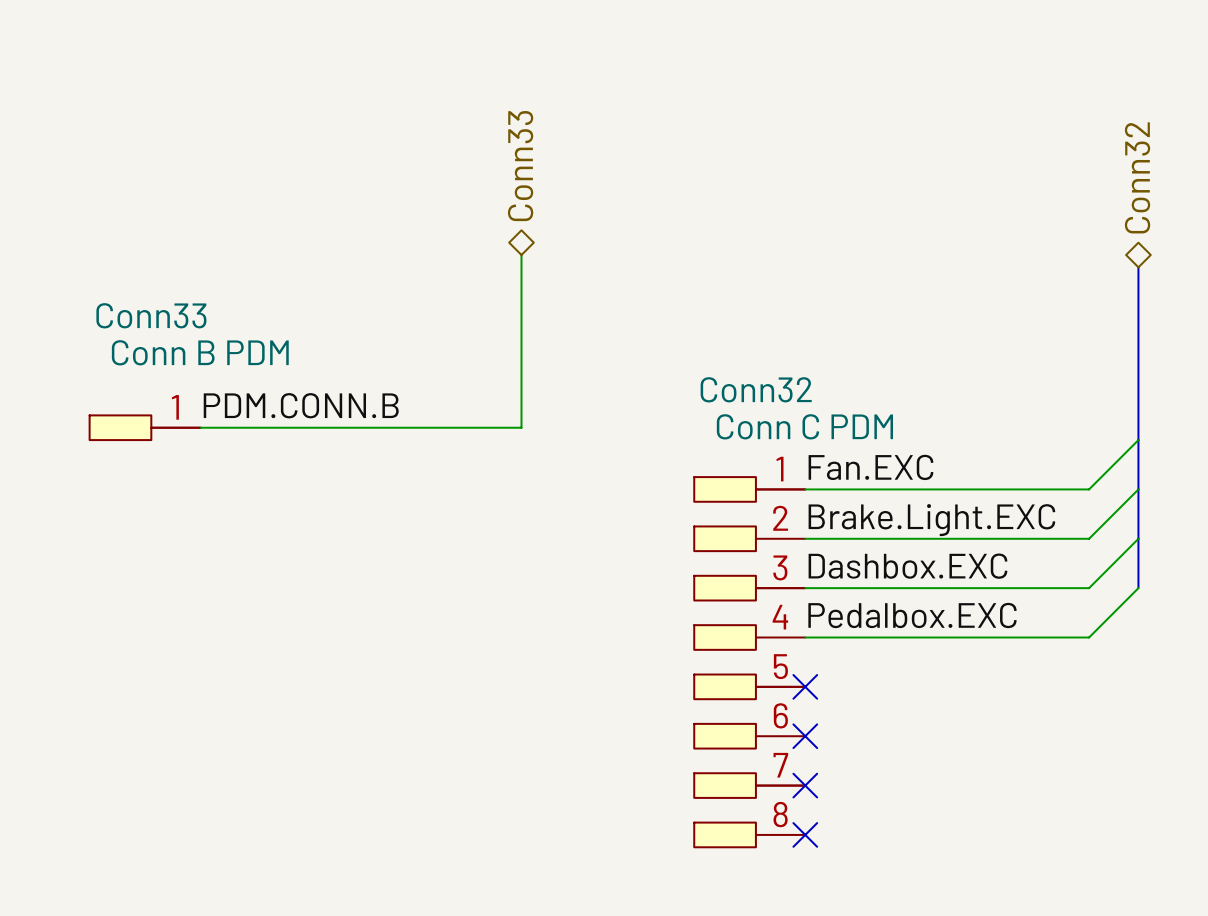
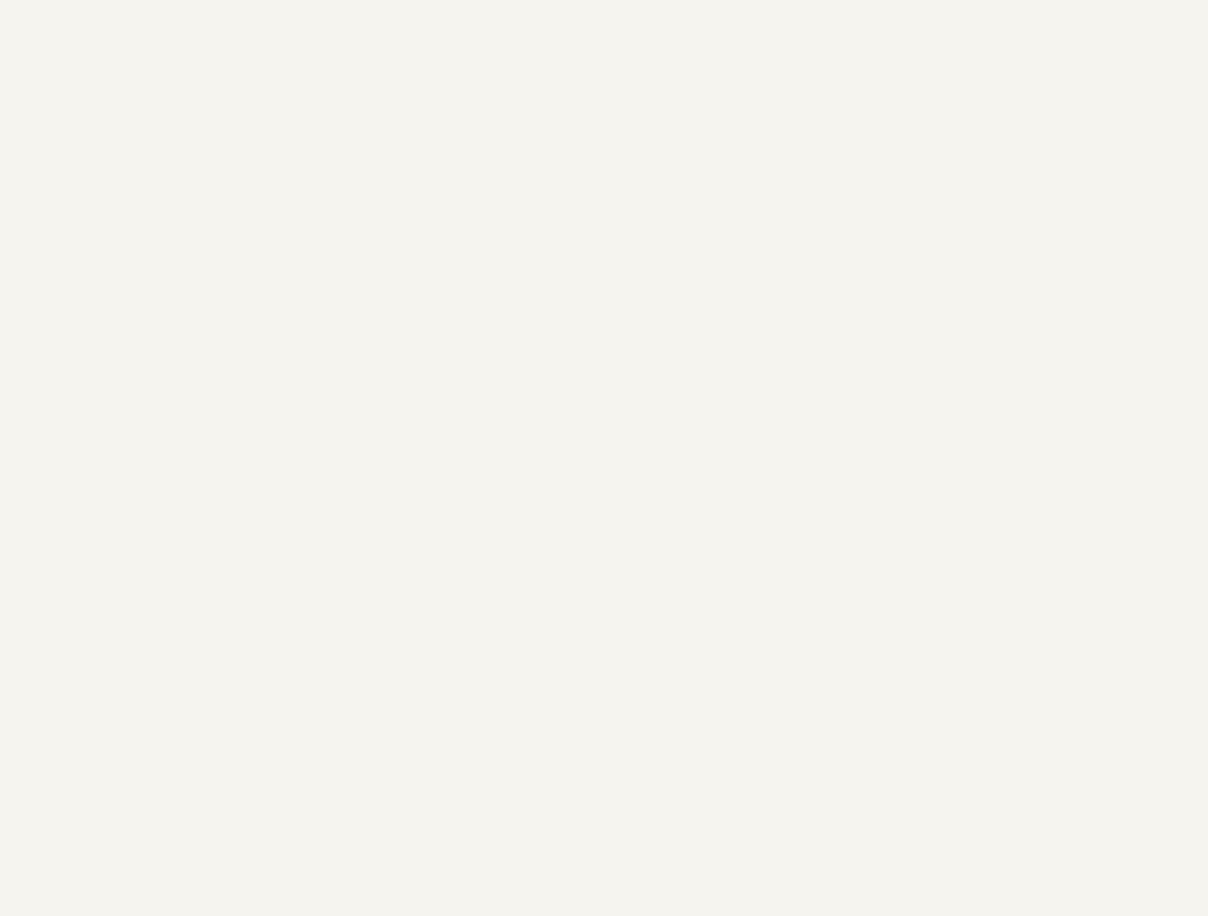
hierarchical label: Conn33 (520, 166) -> none
hierarchical label: Conn32 (1137, 177) -> none
wire: (521, 254) (521, 427) (200, 427) -> none
bus: (1138, 267) (1138, 588) -> none
label: PDM.CONN.B (301, 405) -> none
Conn33: Conn B PDM (145, 427) -> none
wire: (1138, 440) (1089, 489) (805, 489) -> none
label: Fan.EXC (870, 467) -> none
wire: (1138, 489) (1089, 538) (805, 538) -> none
label: Brake.Light.EXC (931, 520) -> none
wire: (1138, 538) (1089, 588) (805, 588) -> none
label: Dashbox.EXC (907, 566) -> none
wire: (1138, 588) (1089, 637) (805, 637) -> none
label: Pedalbox.EXC (912, 615) -> none
Conn32: Conn C PDM (749, 662) -> none
no-connect mark: (805, 686) -> none
no-connect mark: (805, 736) -> none
no-connect mark: (805, 785) -> none
no-connect mark: (805, 834) -> none

